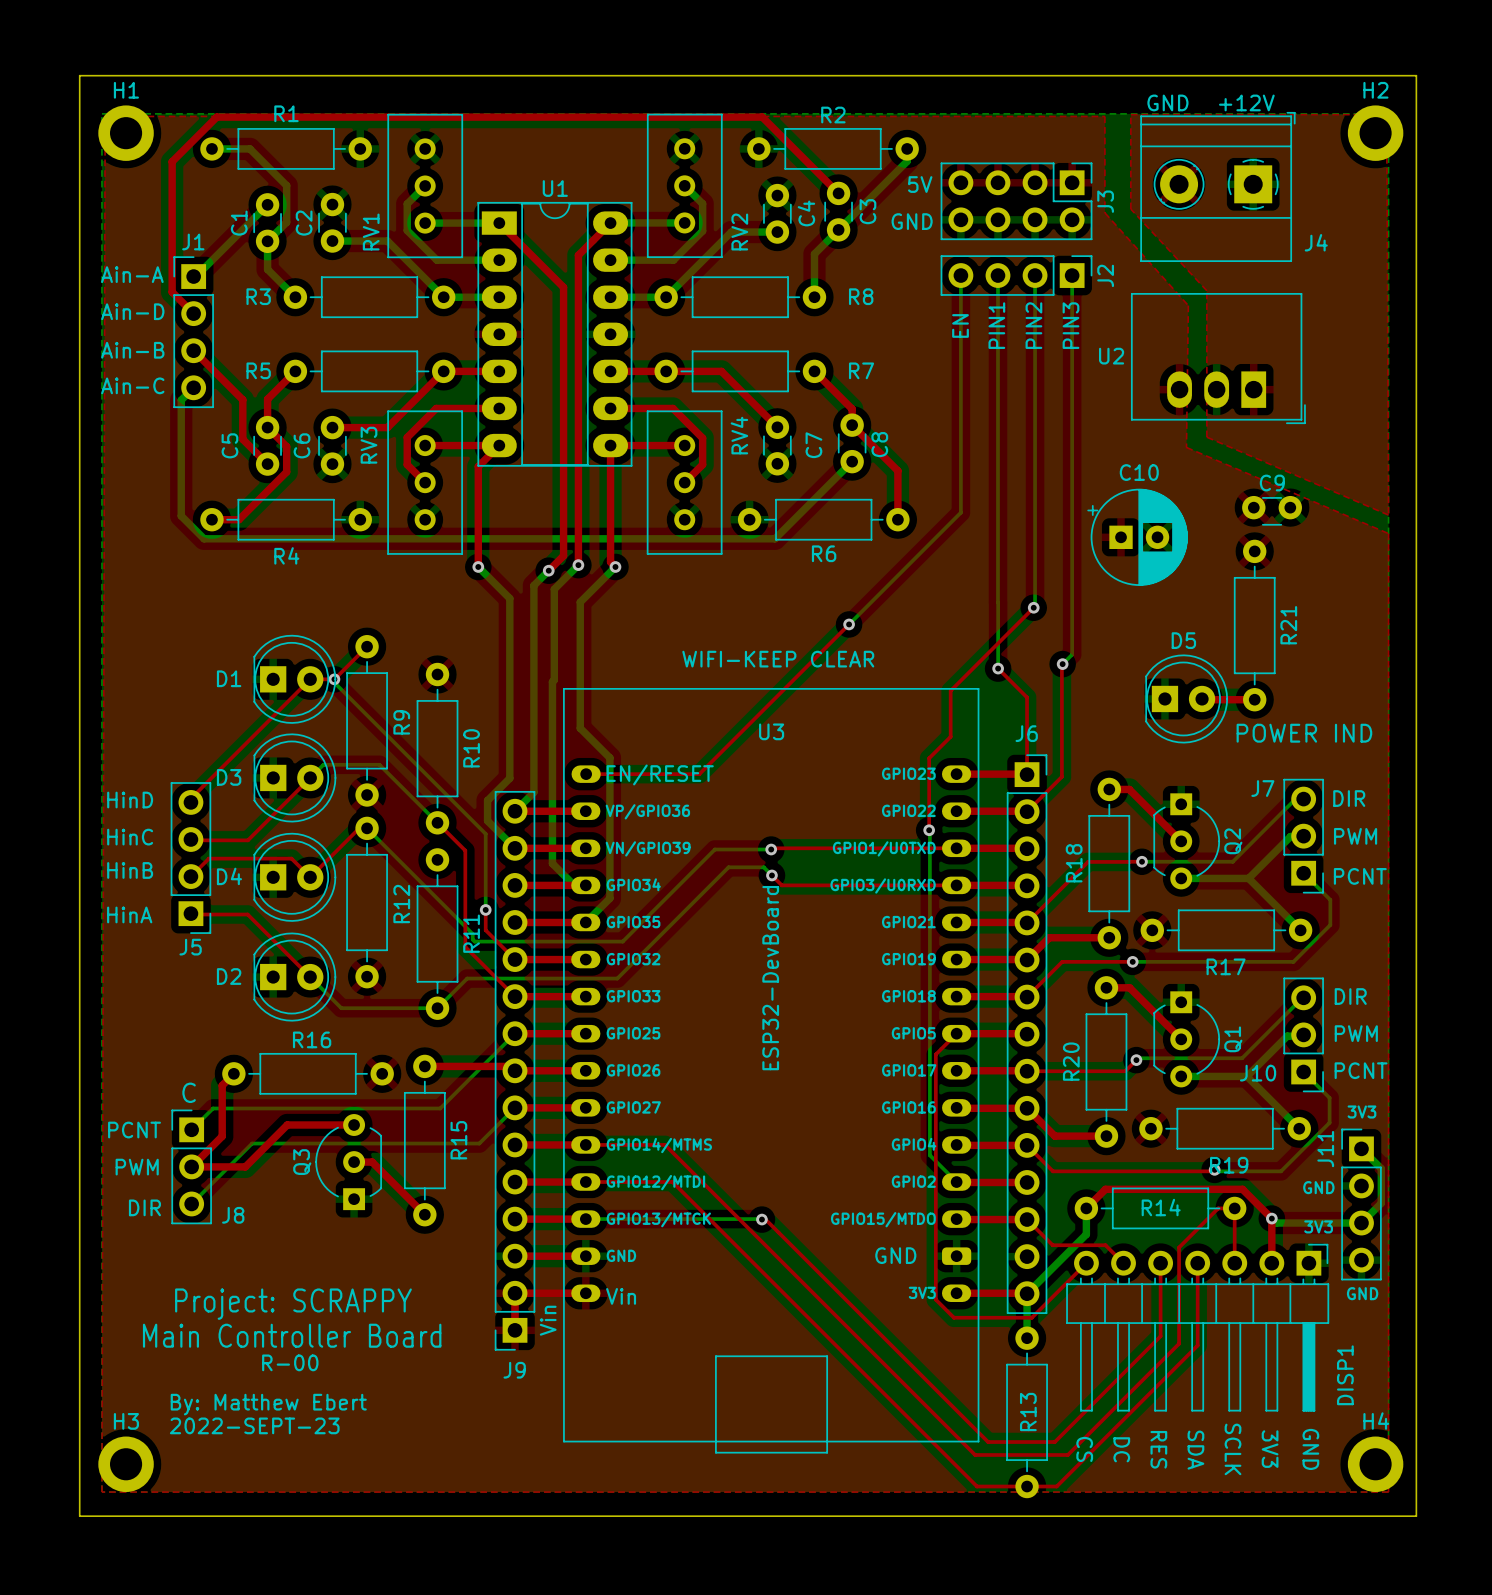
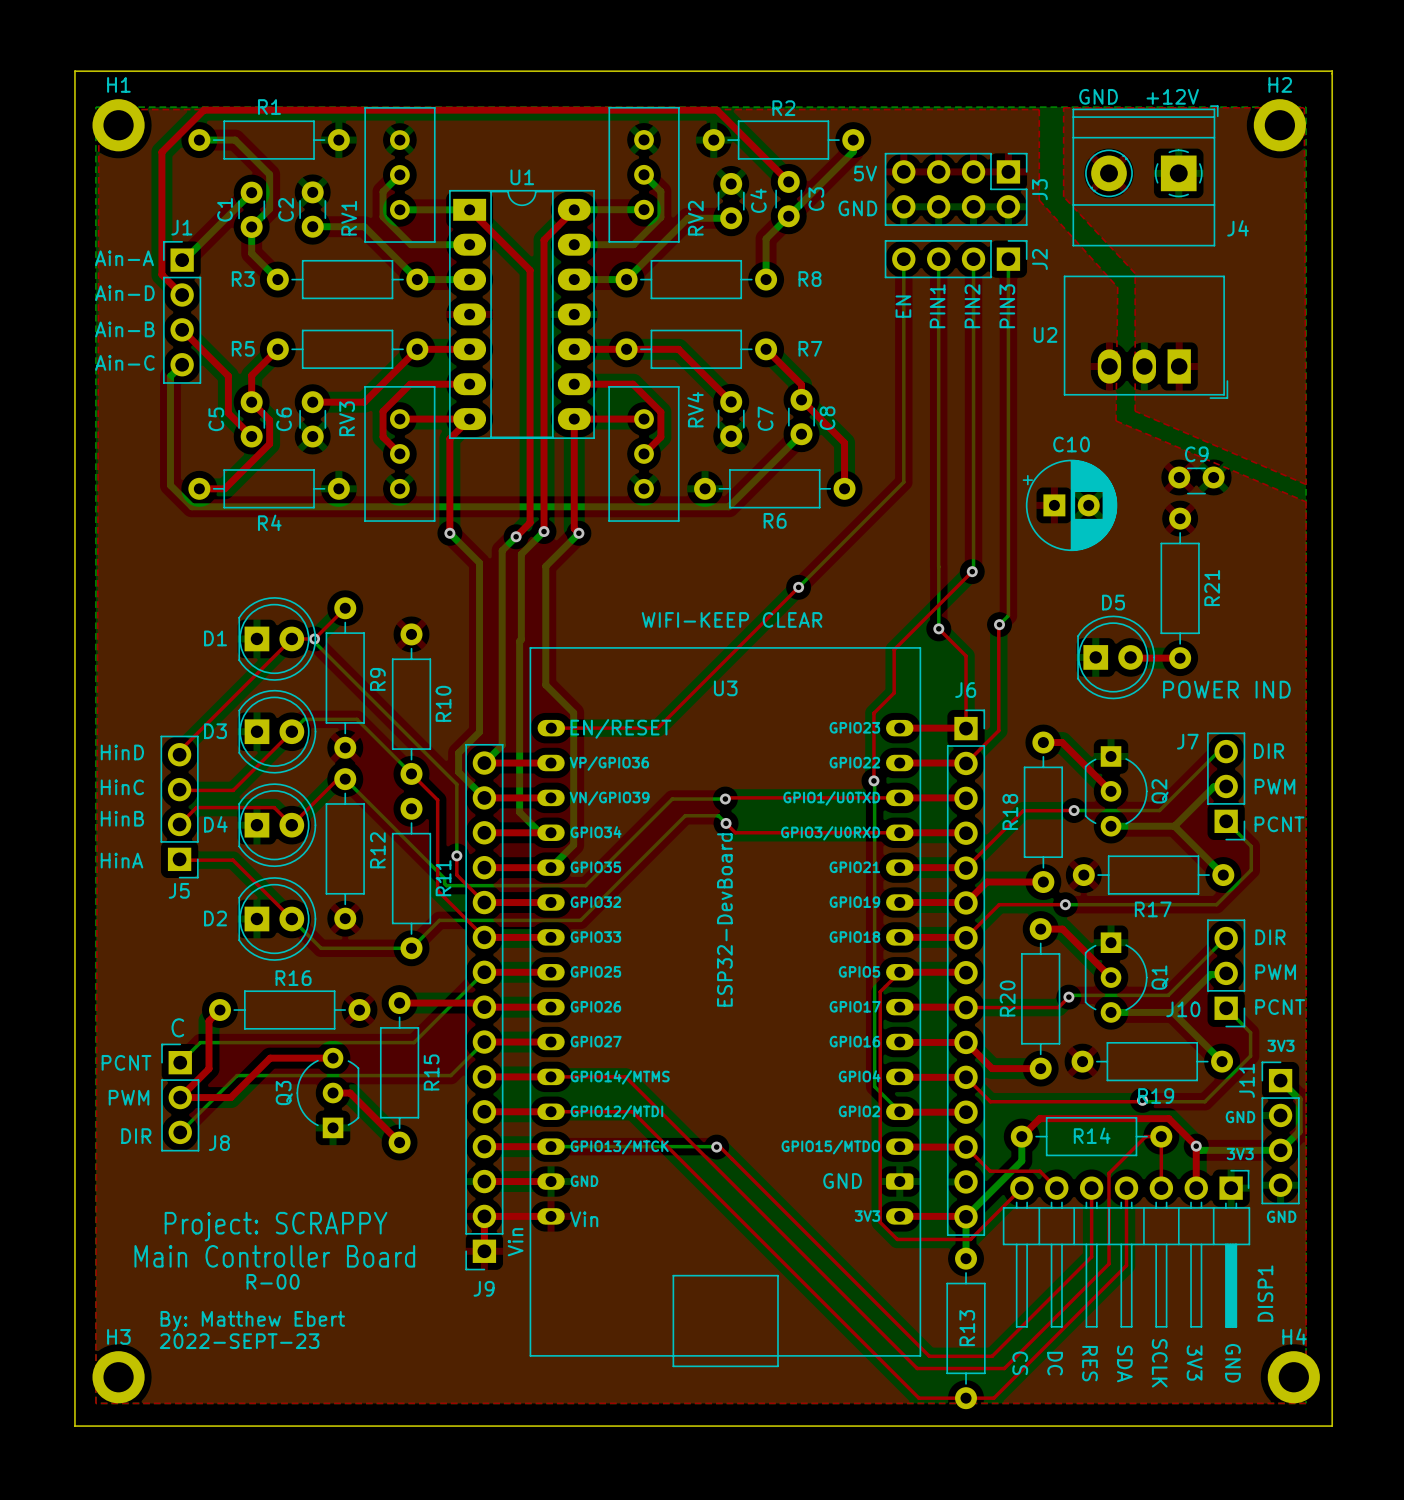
H2 position: (1375, 133) -> (1279, 125)

